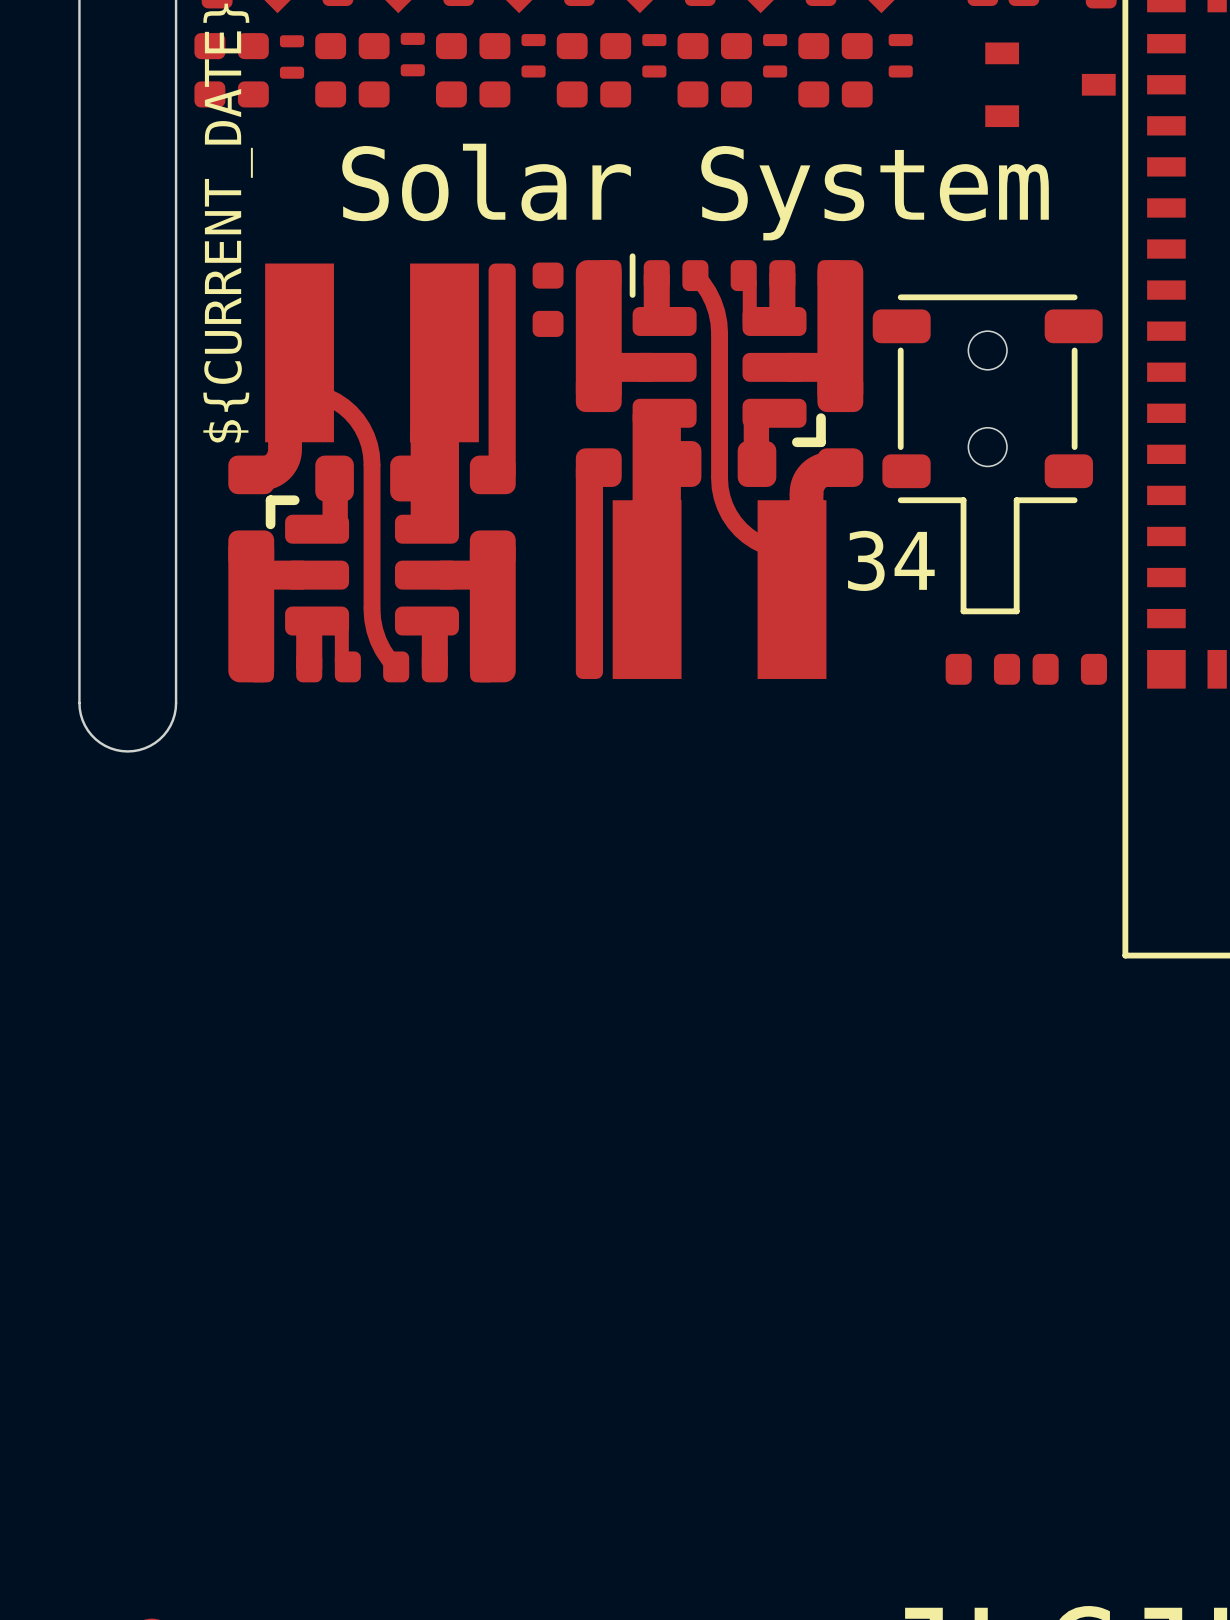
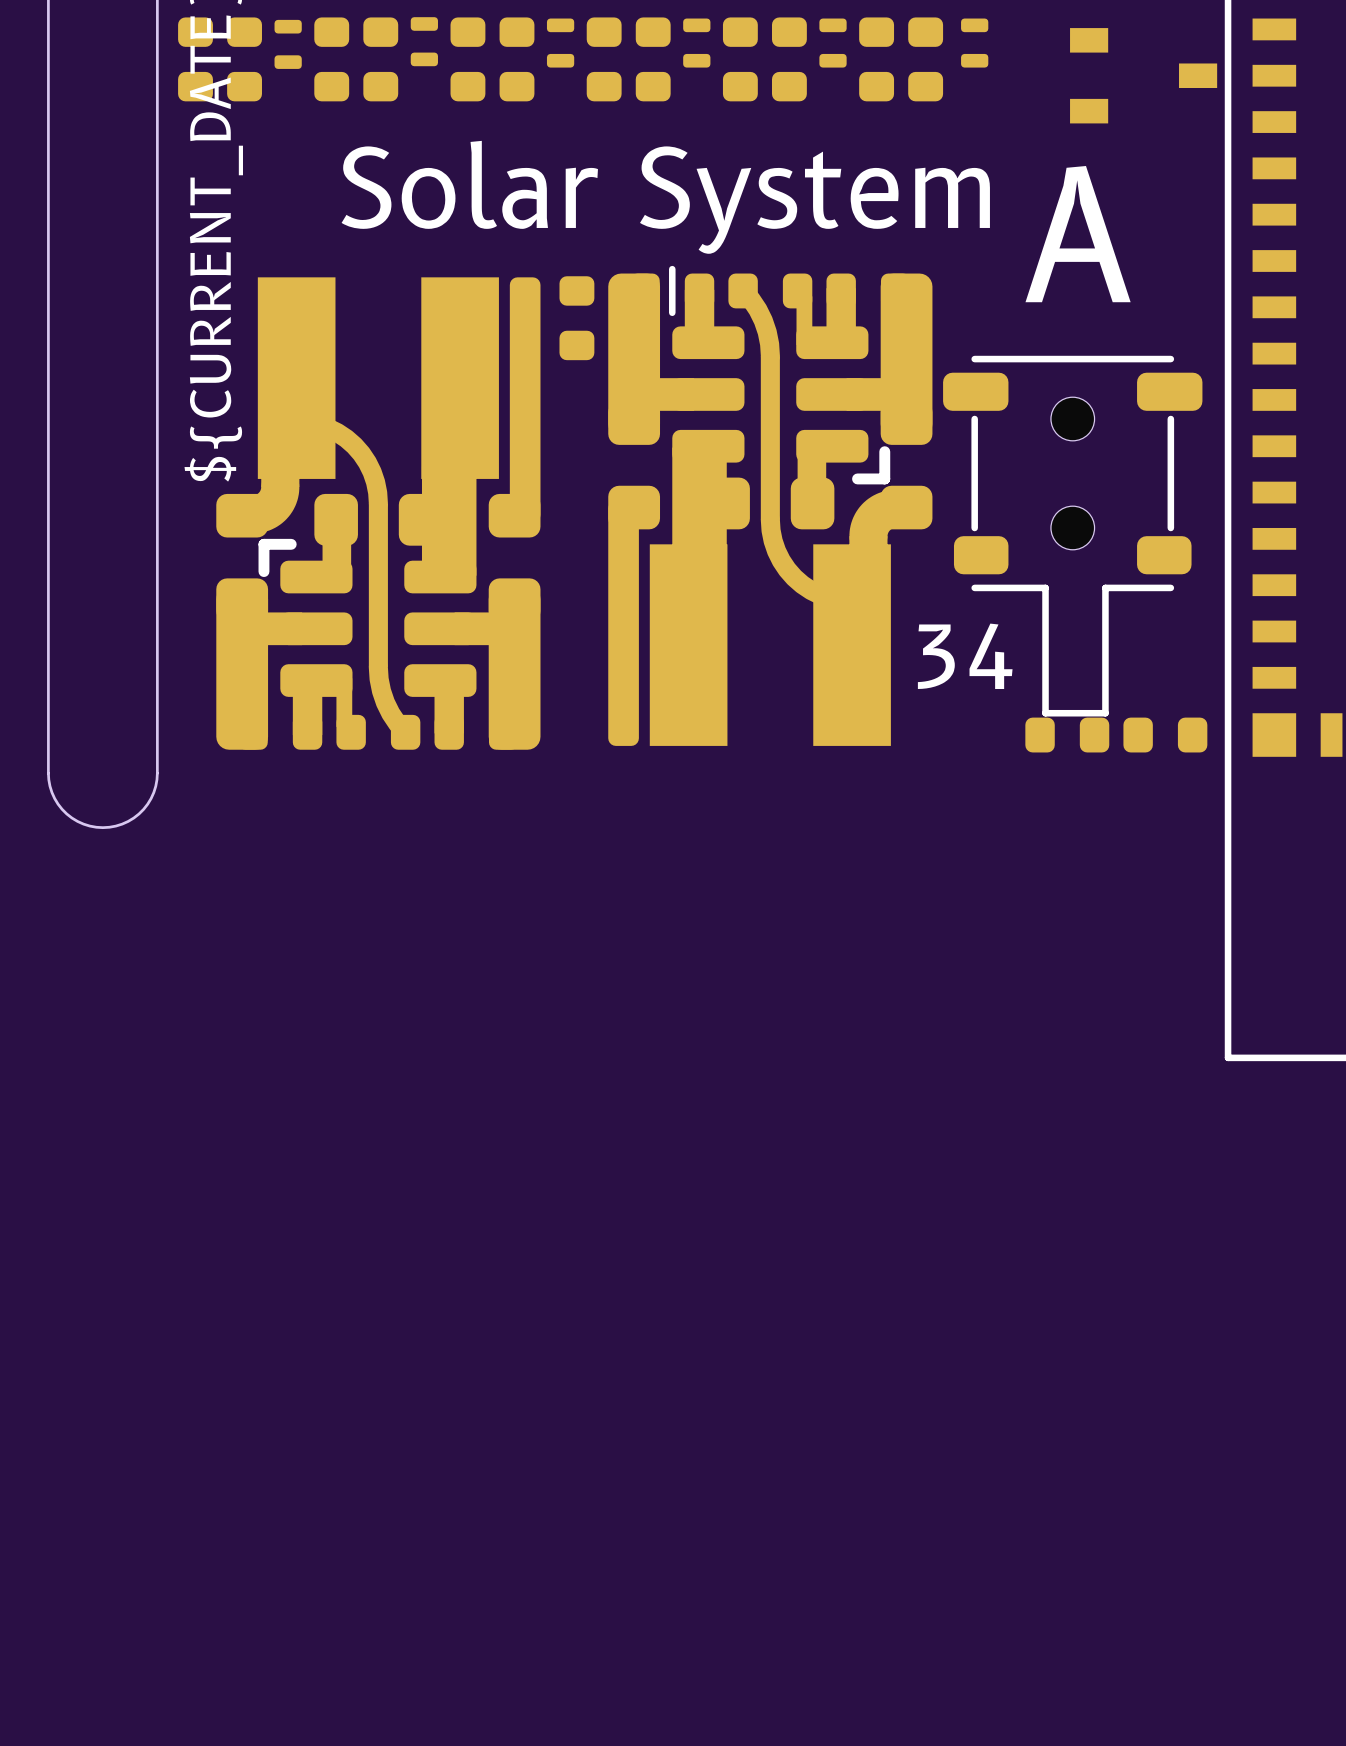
text: none -> A (1078, 234)
part position: (987, 454) -> (1072, 536)
text position: 34 (891, 560) -> 34 (965, 656)

